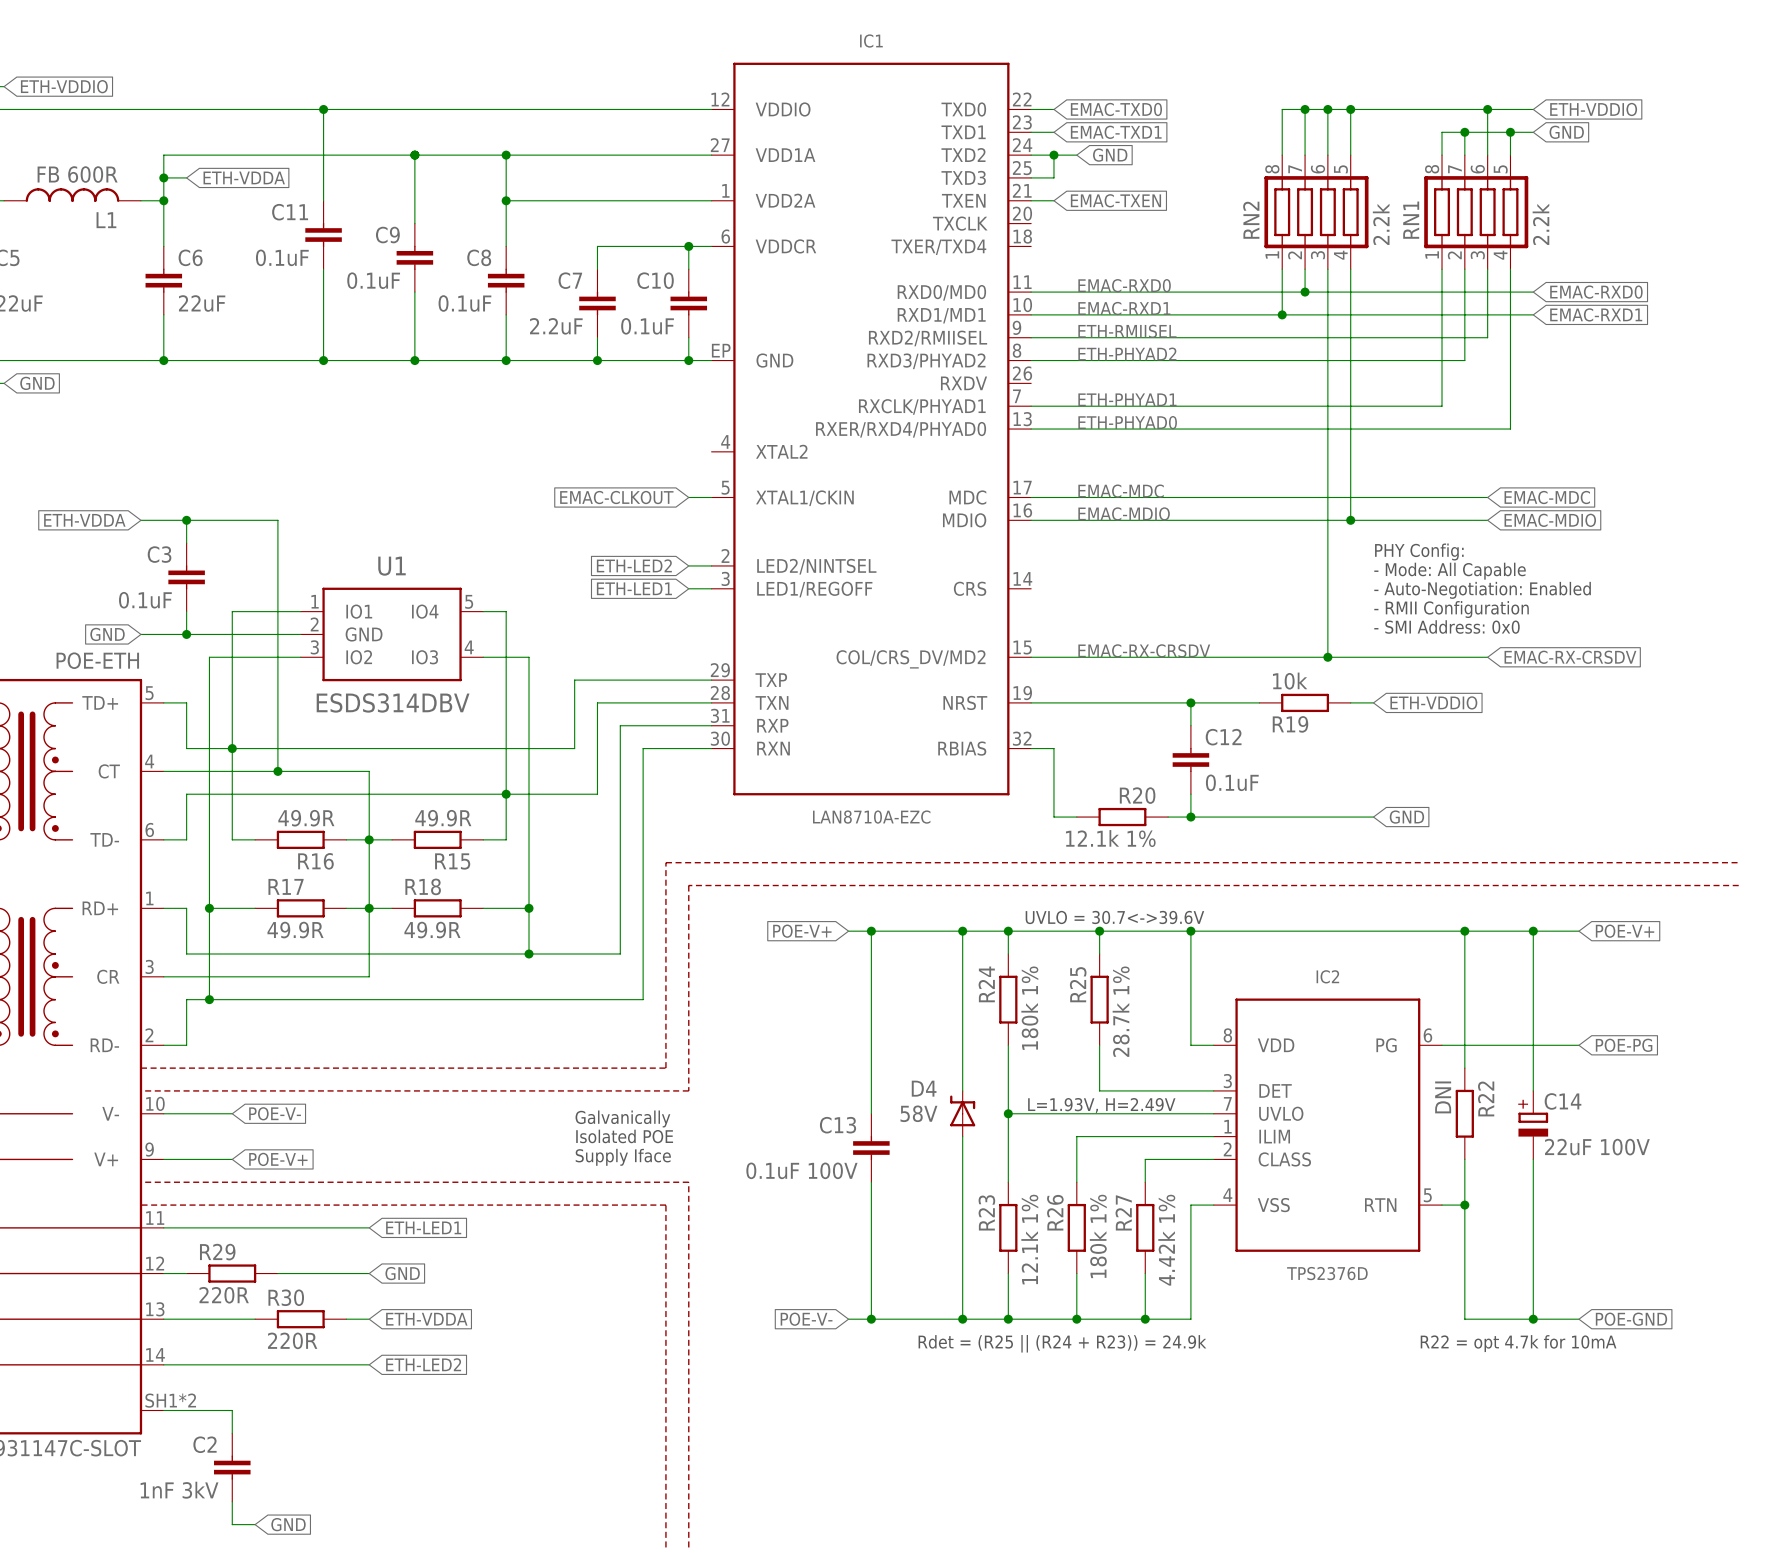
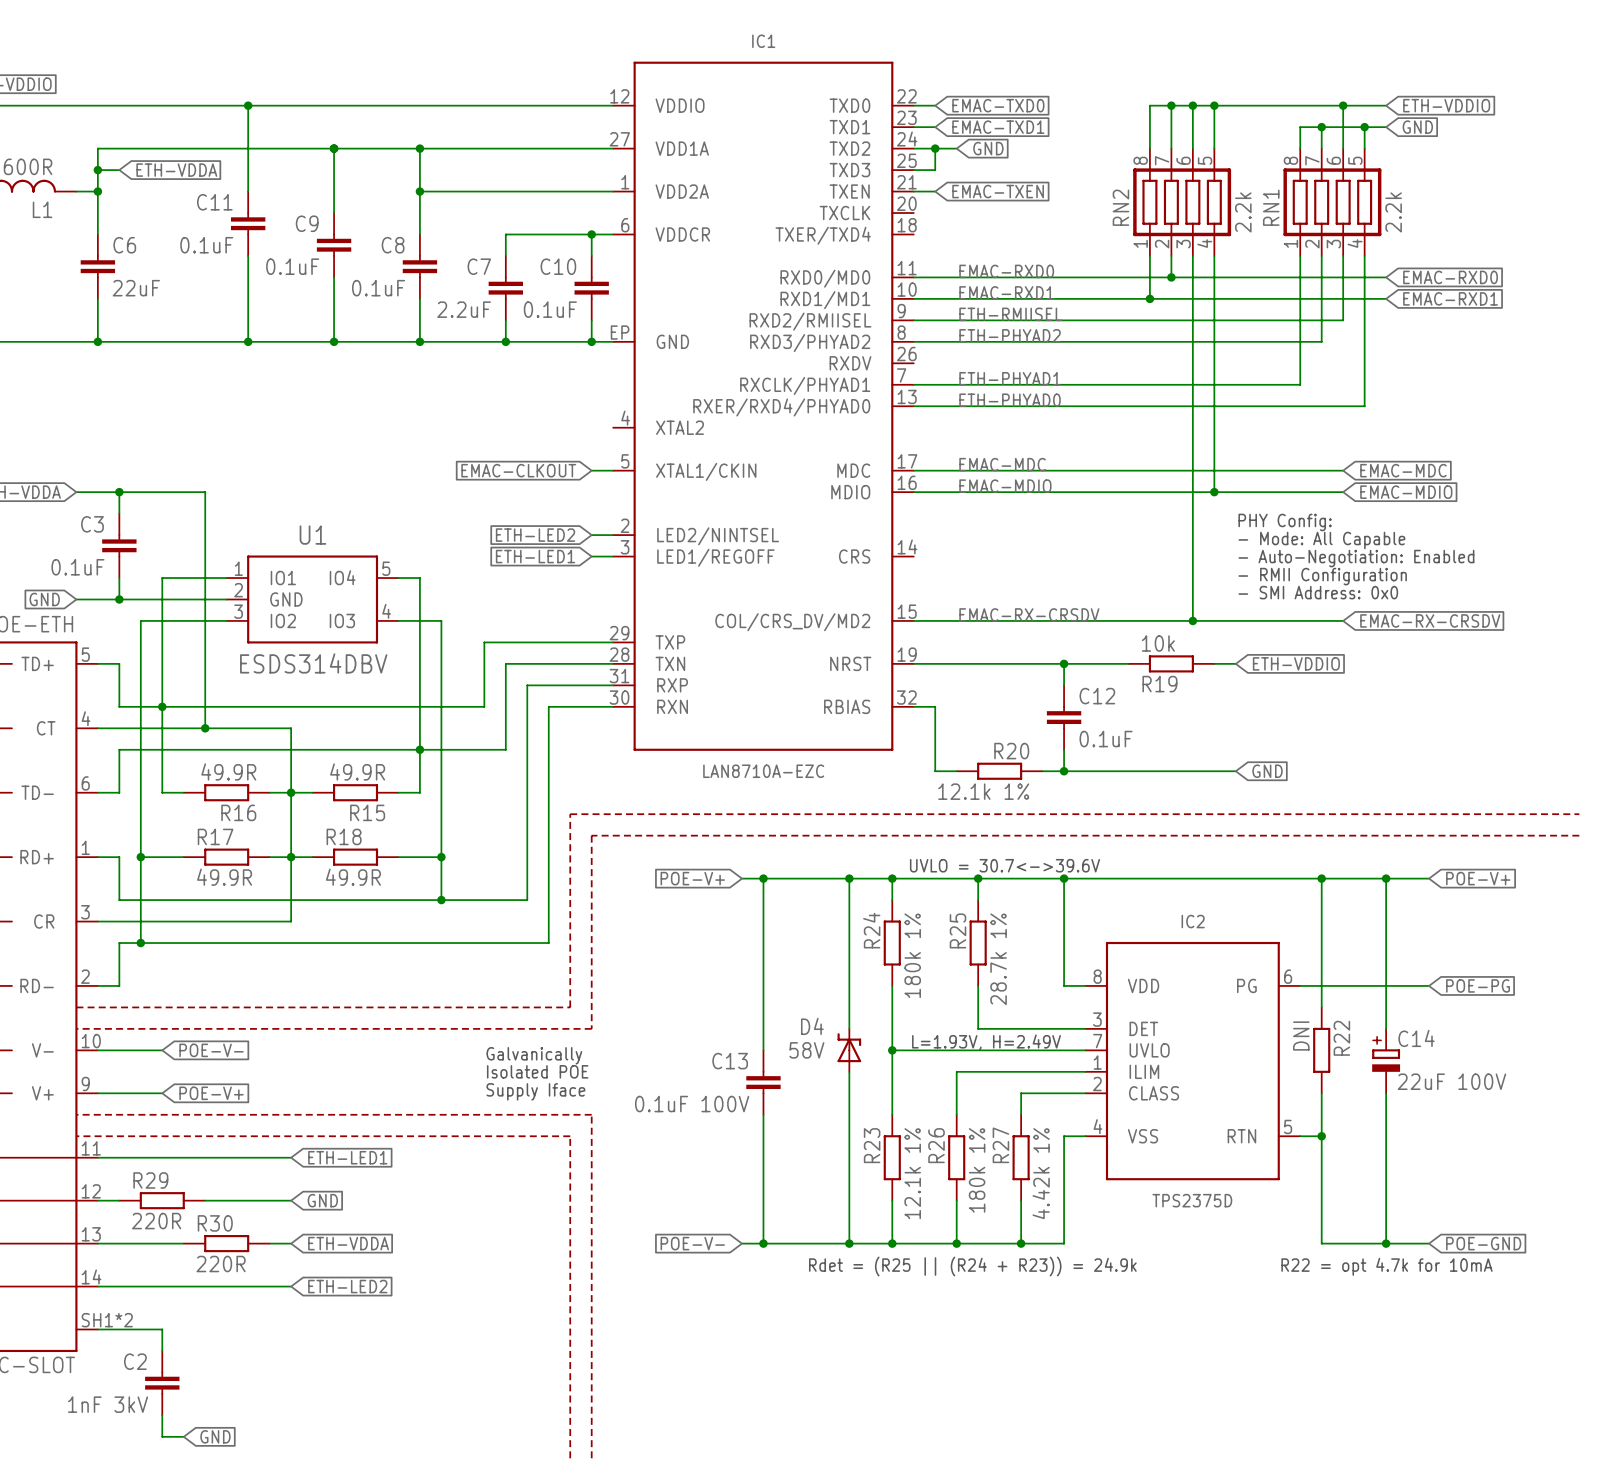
IC2 value: TPS2376D (1327, 1273) -> TPS2375D (1192, 1200)

